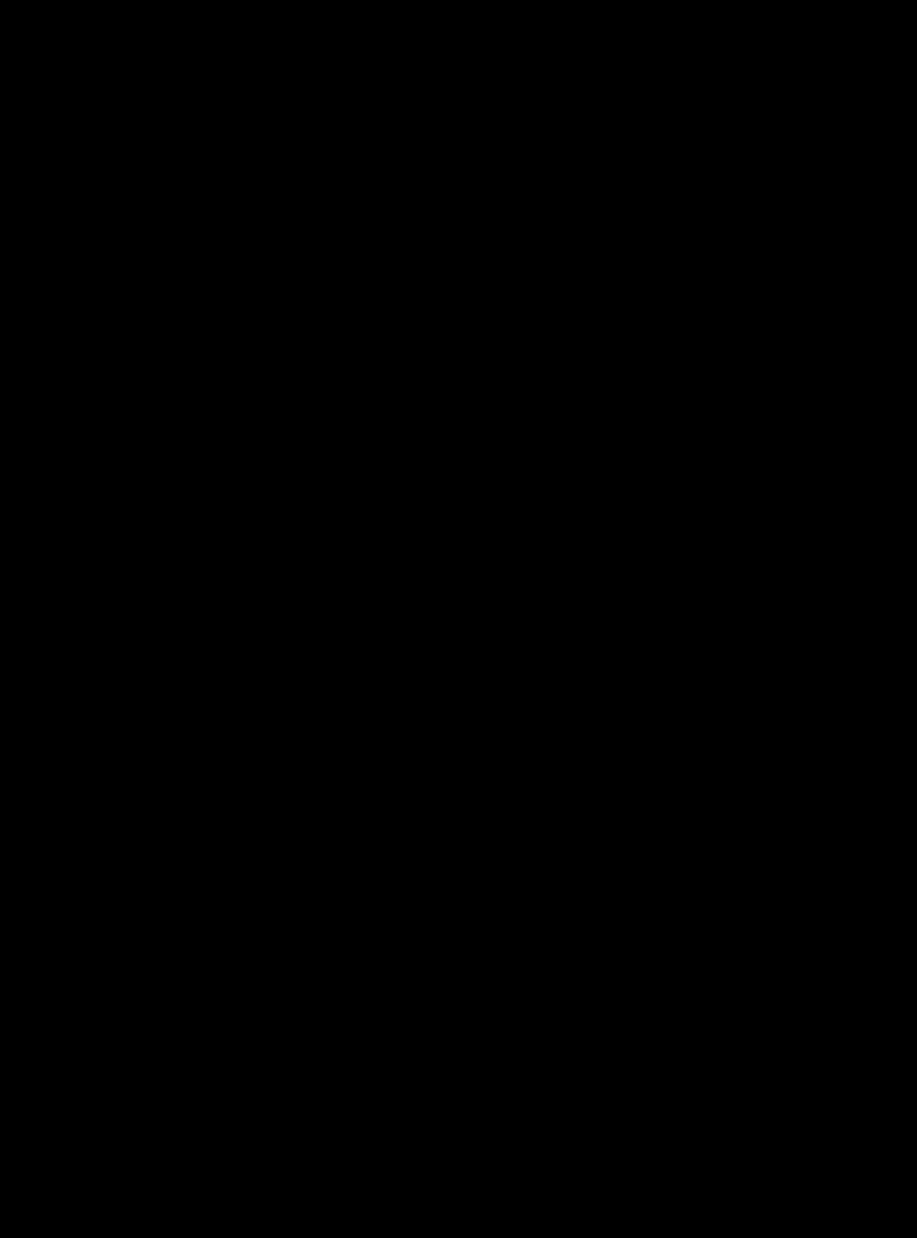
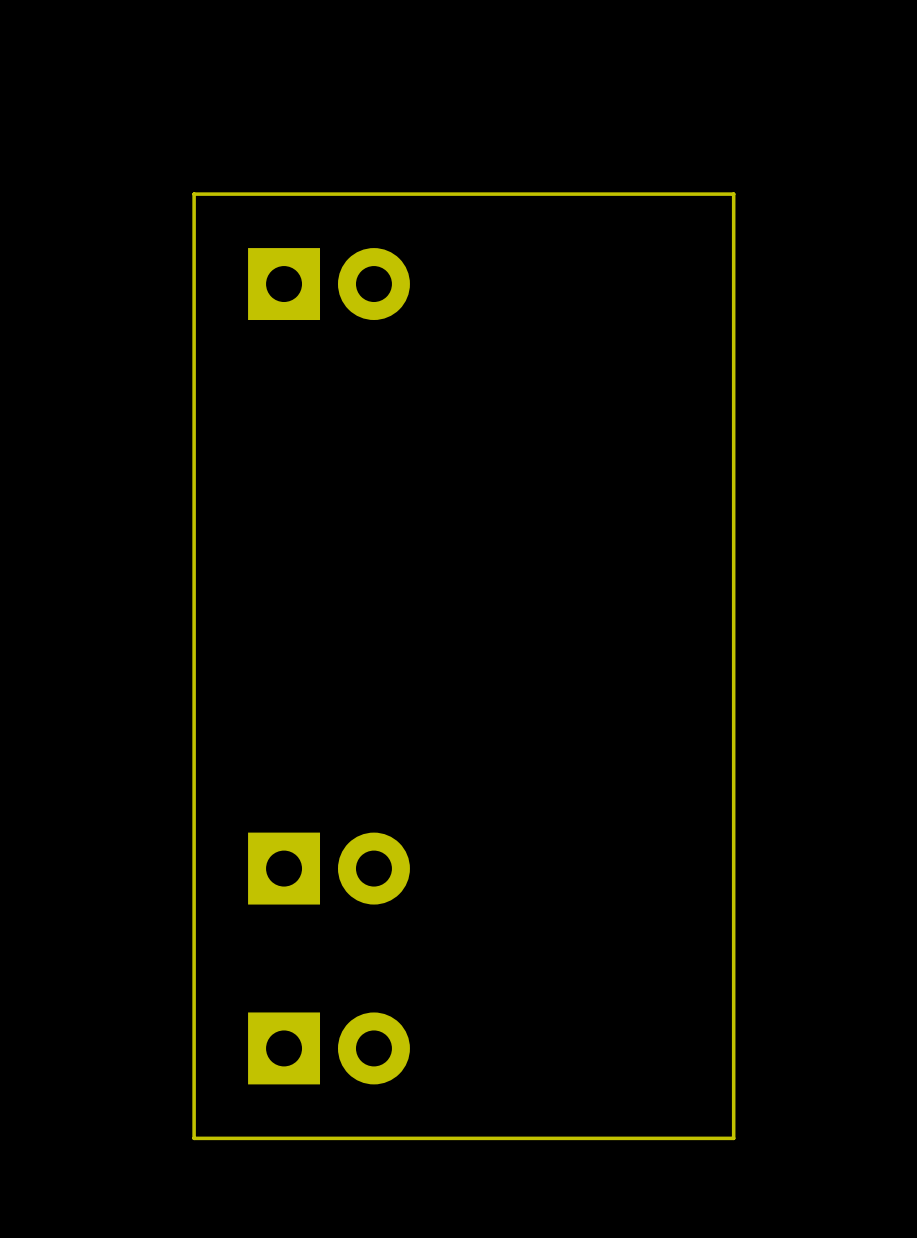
board edge: none -> (733, 194) (733, 1138) (194, 1138) (194, 194) (733, 194)
part: none -> (329, 284)
part: none -> (329, 868)
part: none -> (329, 1048)

